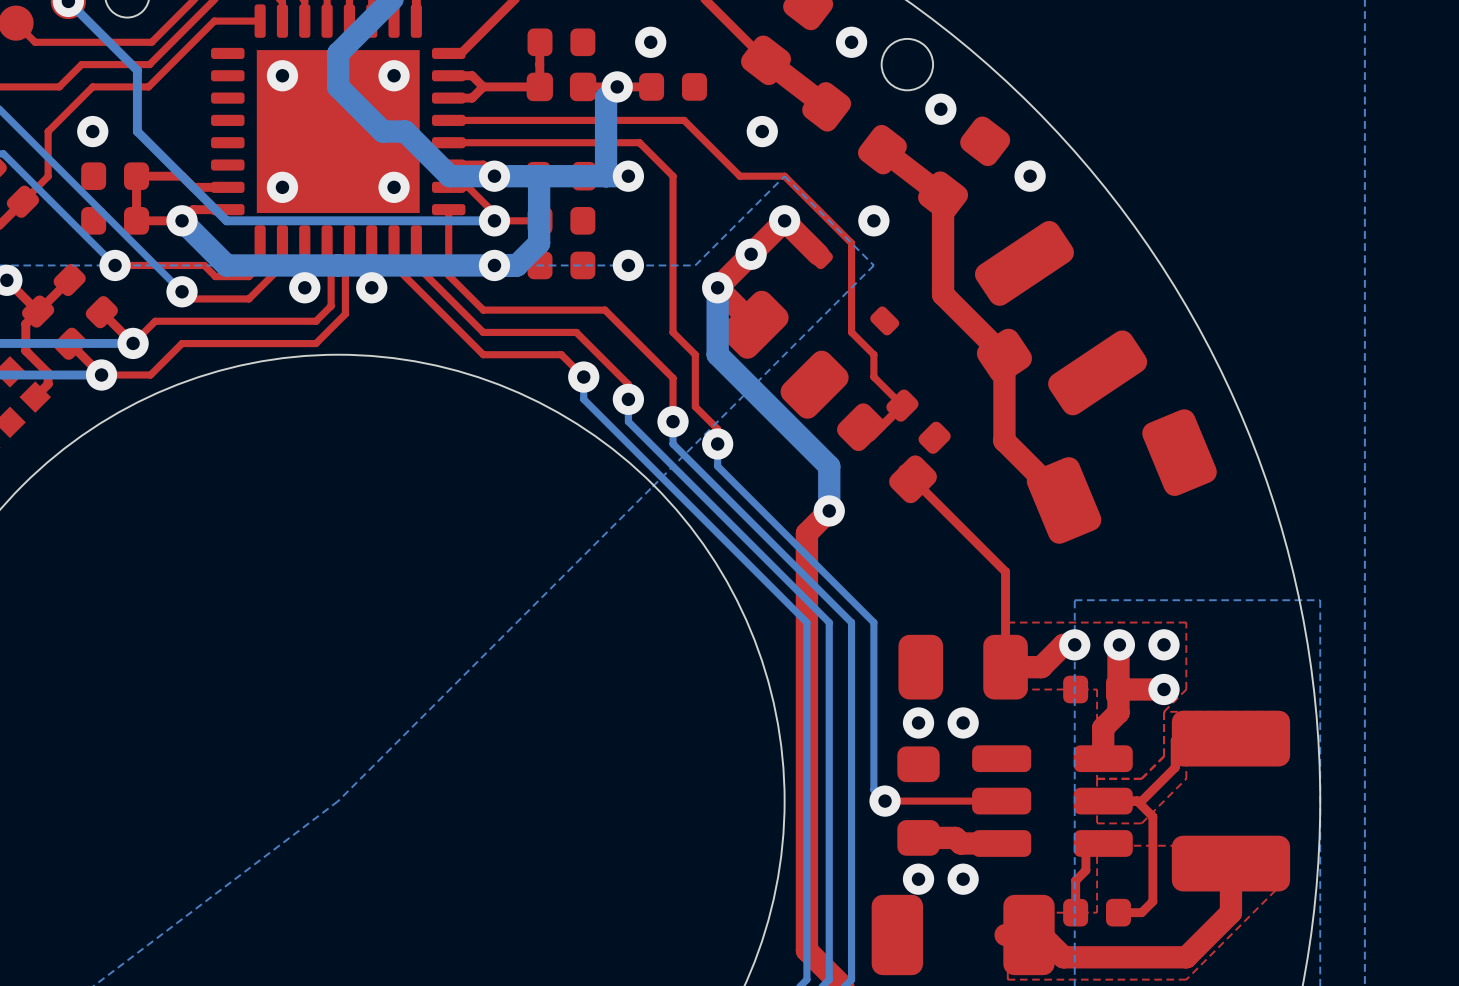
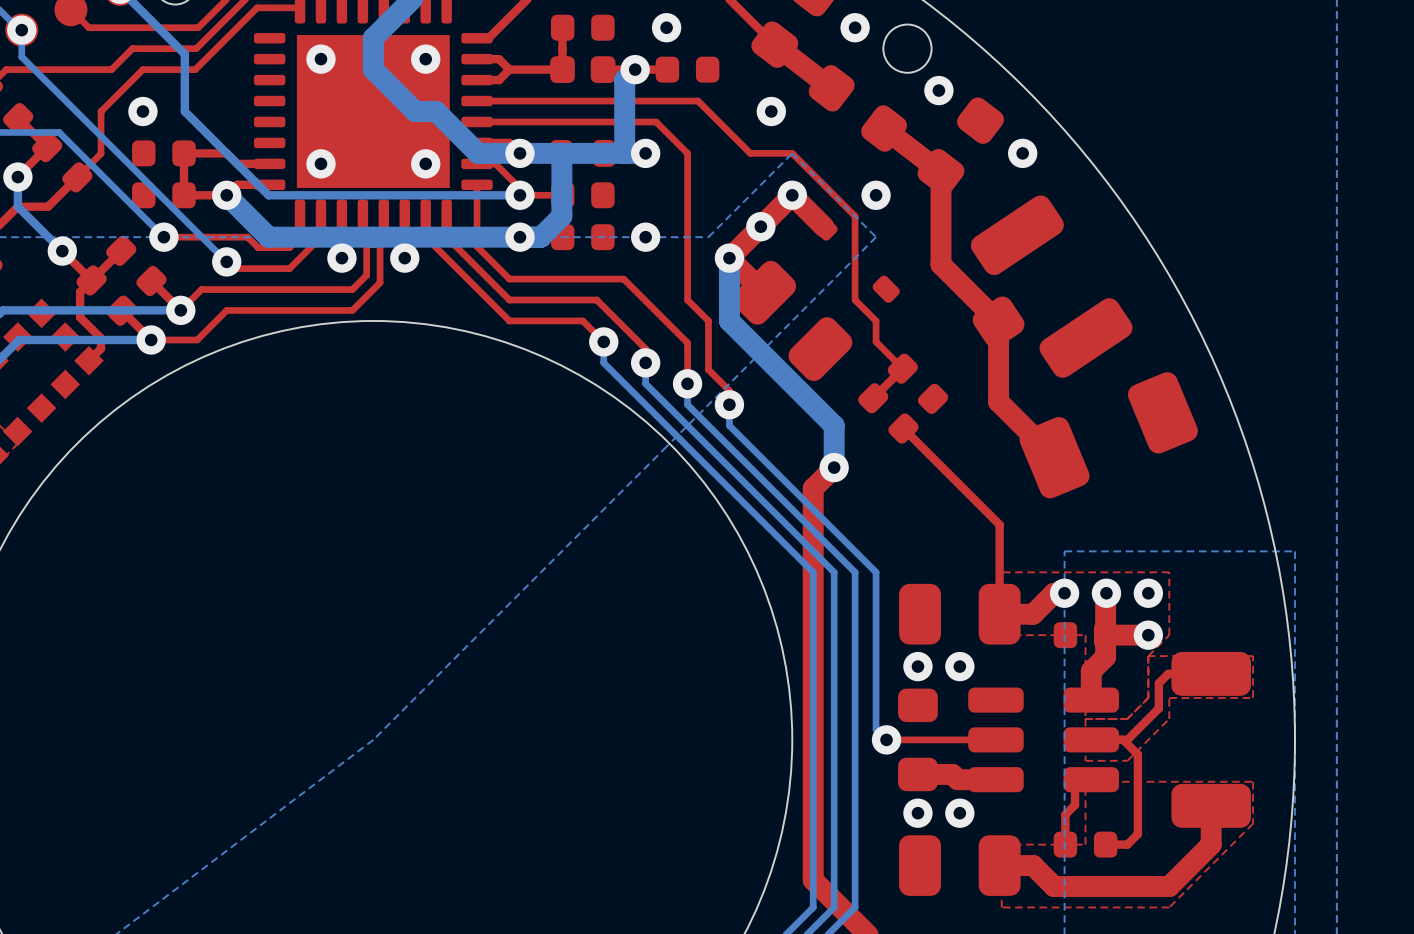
part footprint: [837, 403, 937, 504] -> [858, 383, 919, 444]
part footprint: [1171, 710, 1291, 892] -> [1171, 651, 1251, 828]
part footprint: [871, 894, 1055, 976] -> [899, 835, 1021, 896]

